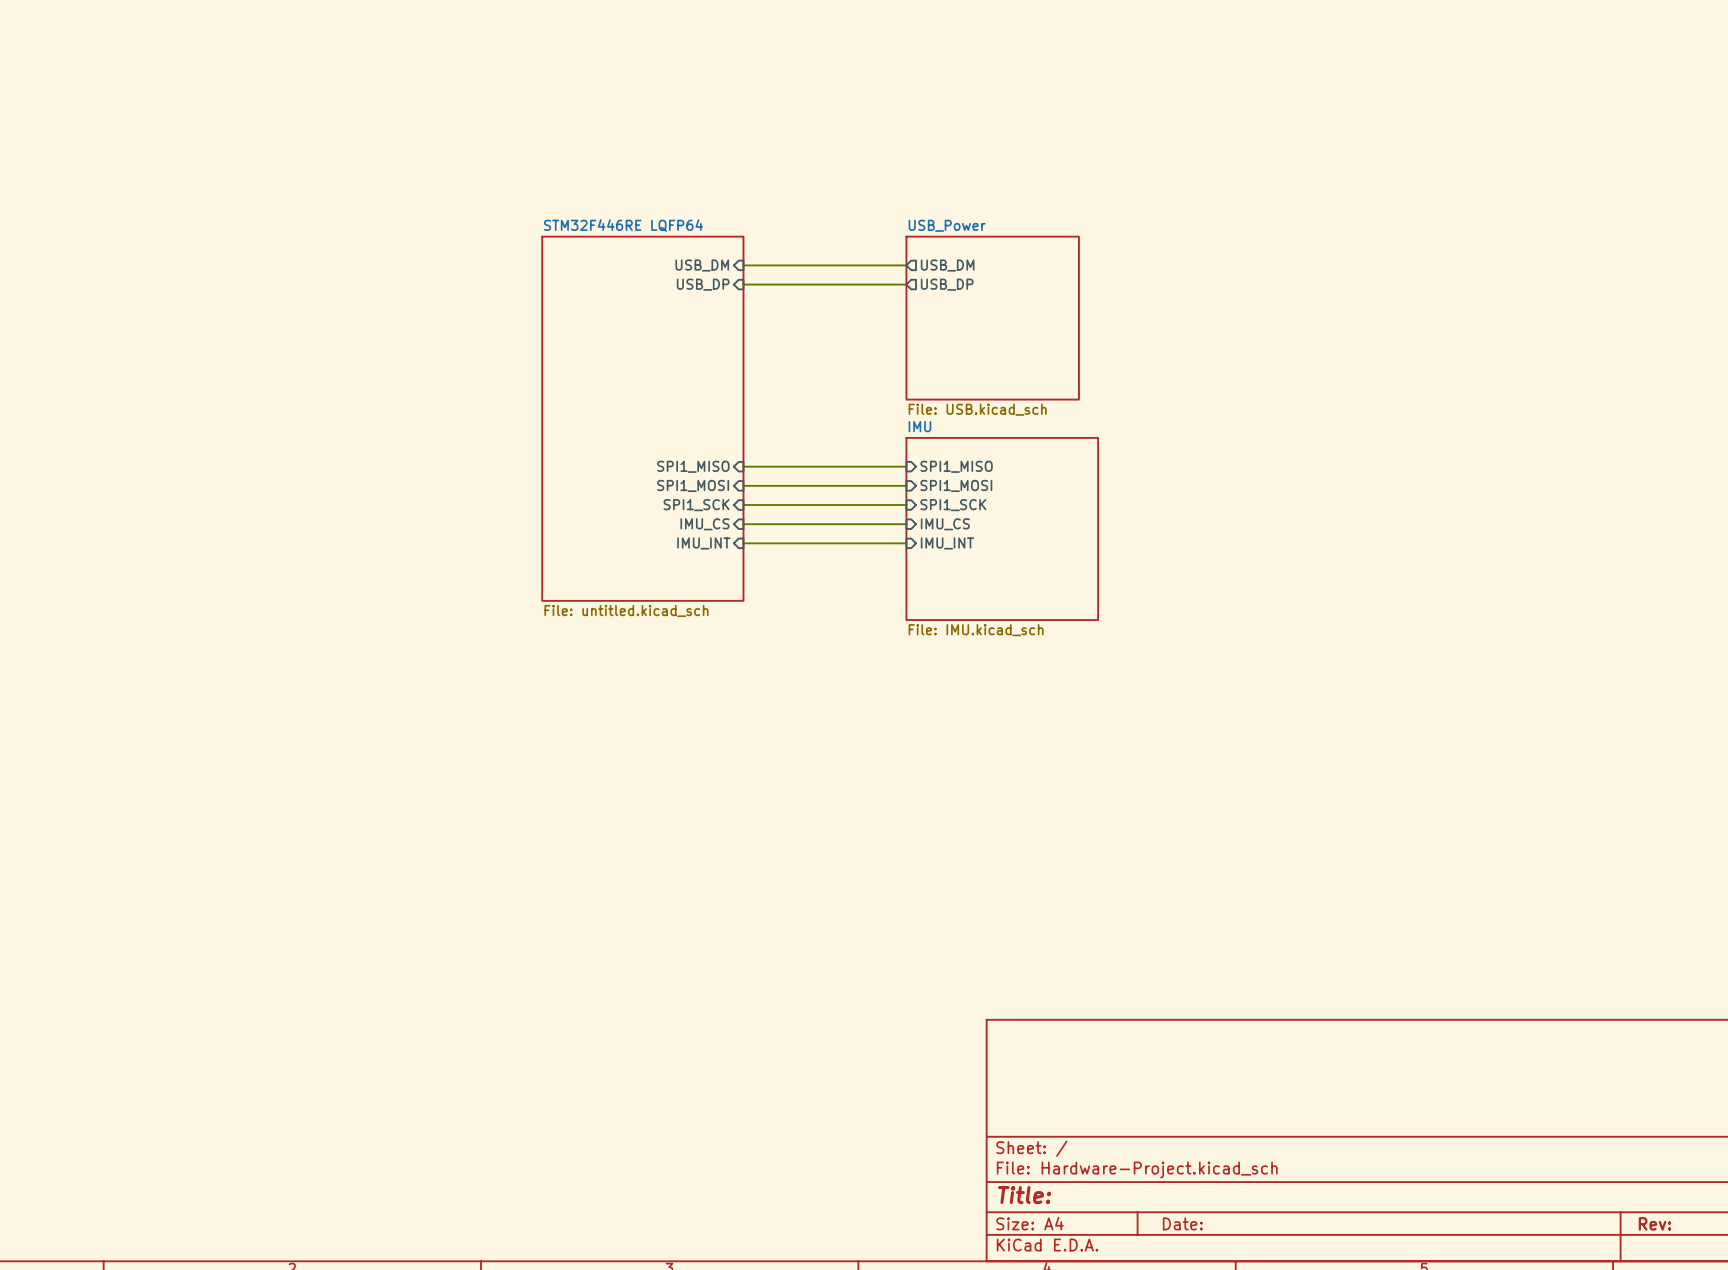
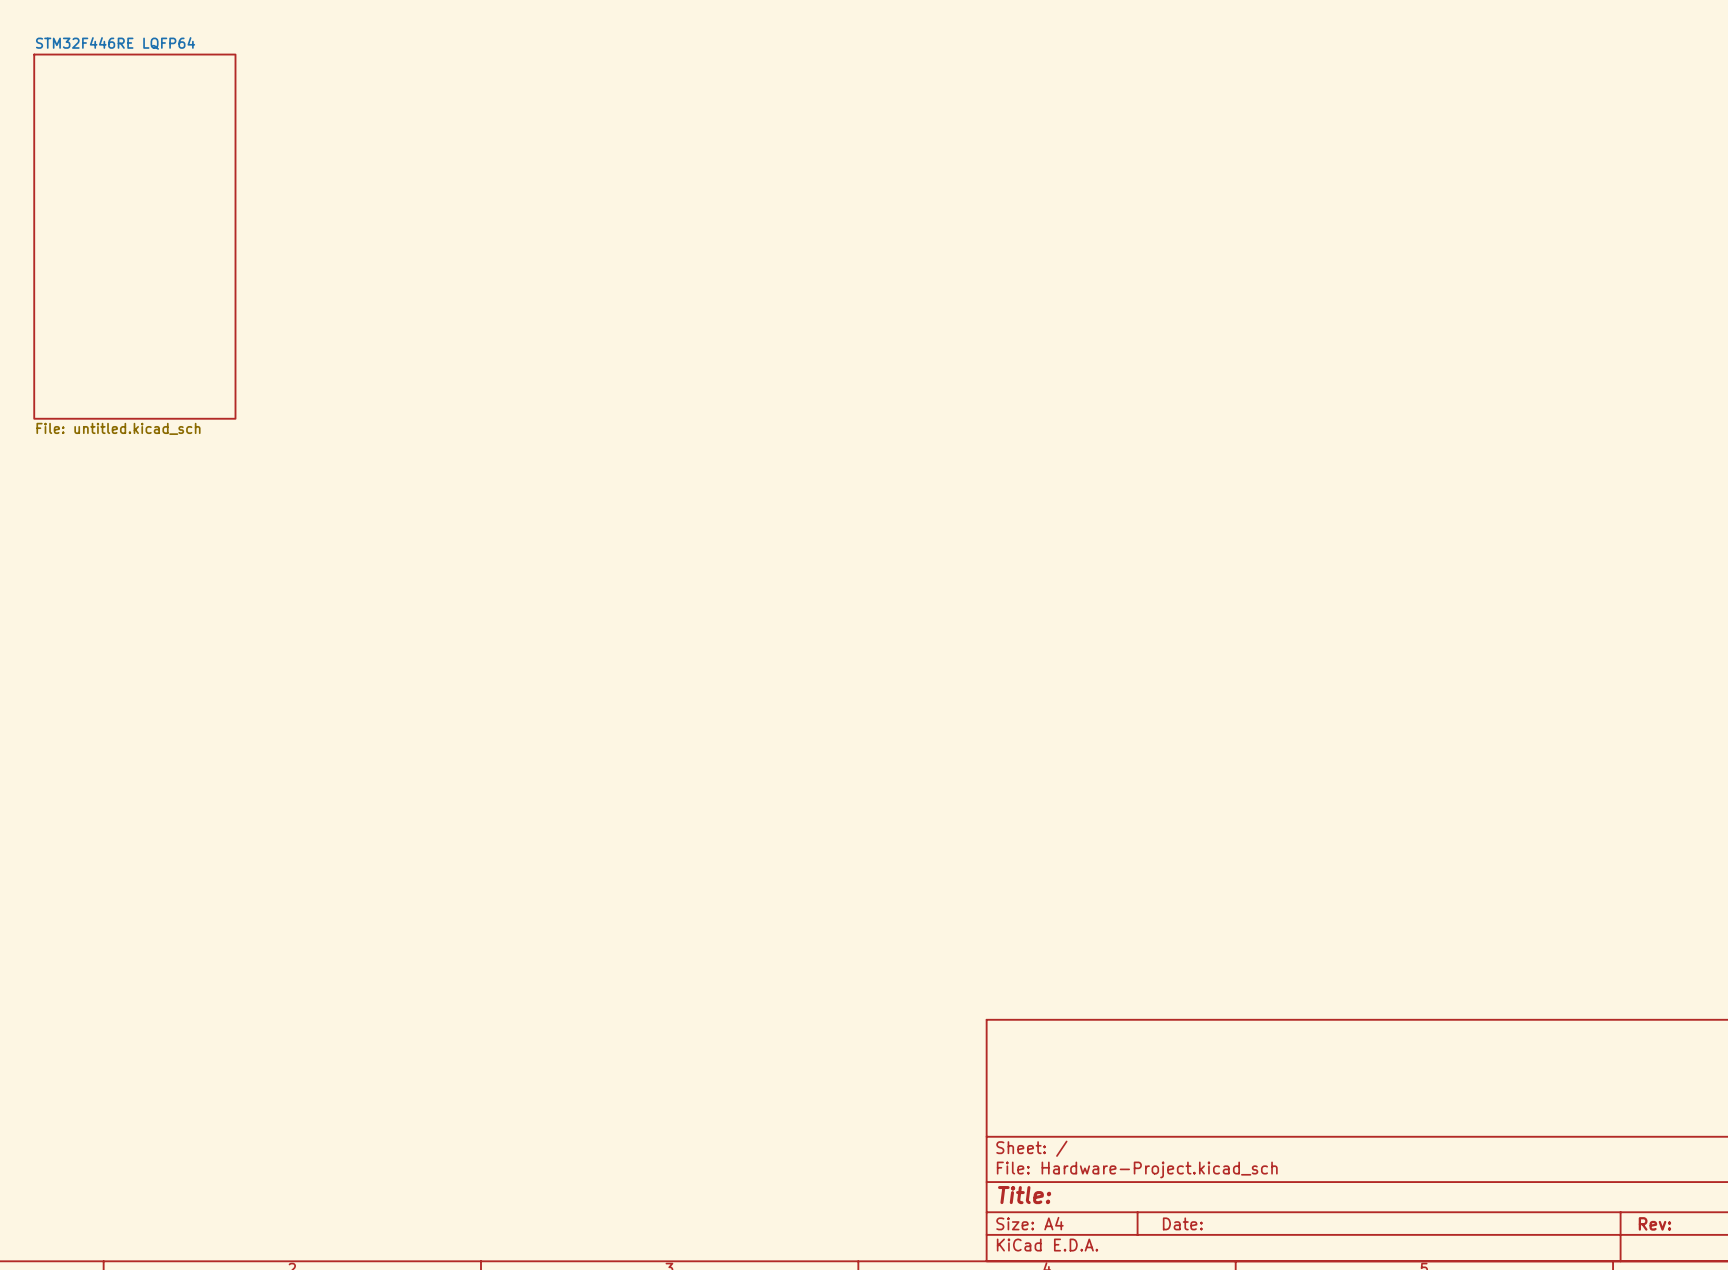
sheet pin: USB_DM (702, 265) -> none
wire: (743, 265) (906, 265) -> none
sheet pin: USB_DM (947, 265) -> none
sheet pin: USB_DP (703, 284) -> none
wire: (743, 284) (906, 284) -> none
sheet pin: USB_DP (947, 284) -> none
sheet USB_Power: File: USB.kicad_sch (992, 318) -> none
sheet STM32F446RE LQFP64 position: (642, 418) -> (134, 236)
sheet pin: SPI1_MISO (693, 466) -> none
wire: (743, 466) (906, 466) -> none
sheet pin: SPI1_MISO (956, 466) -> none
sheet pin: SPI1_MOSI (693, 485) -> none
wire: (743, 485) (906, 485) -> none
sheet pin: SPI1_MOSI (956, 485) -> none
sheet pin: SPI1_SCK (696, 505) -> none
wire: (743, 505) (906, 505) -> none
sheet pin: SPI1_SCK (953, 505) -> none
sheet pin: IMU_CS (704, 524) -> none
wire: (743, 524) (906, 524) -> none
sheet pin: IMU_CS (945, 524) -> none
sheet IMU: File: IMU.kicad_sch (1002, 528) -> none
sheet pin: IMU_INT (703, 543) -> none
wire: (743, 543) (906, 543) -> none
sheet pin: IMU_INT (947, 543) -> none

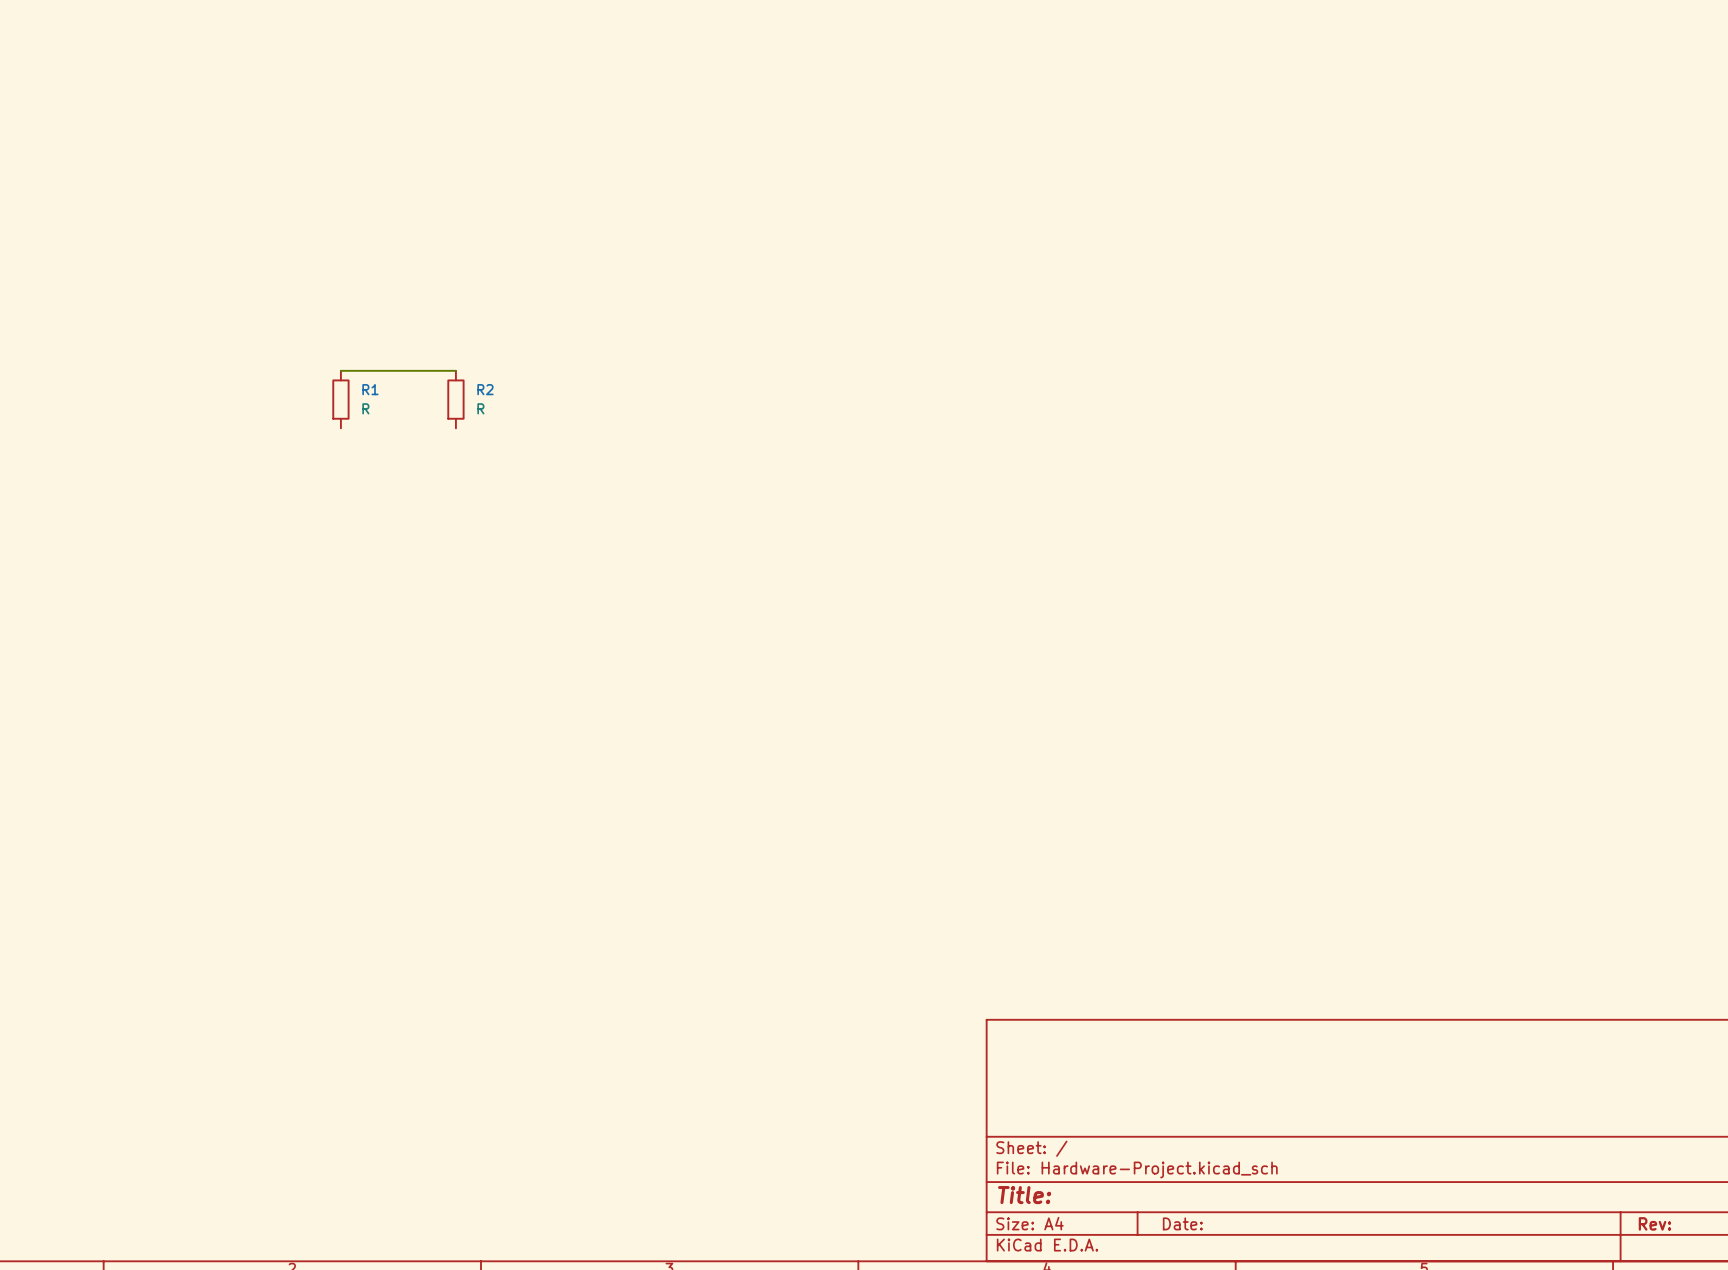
sheet STM32F446RE LQFP64: File: untitled.kicad_sch (134, 236) -> none
wire: none -> (340, 370) (455, 370)
R1: none -> R (340, 399)
R2: none -> R (455, 399)

